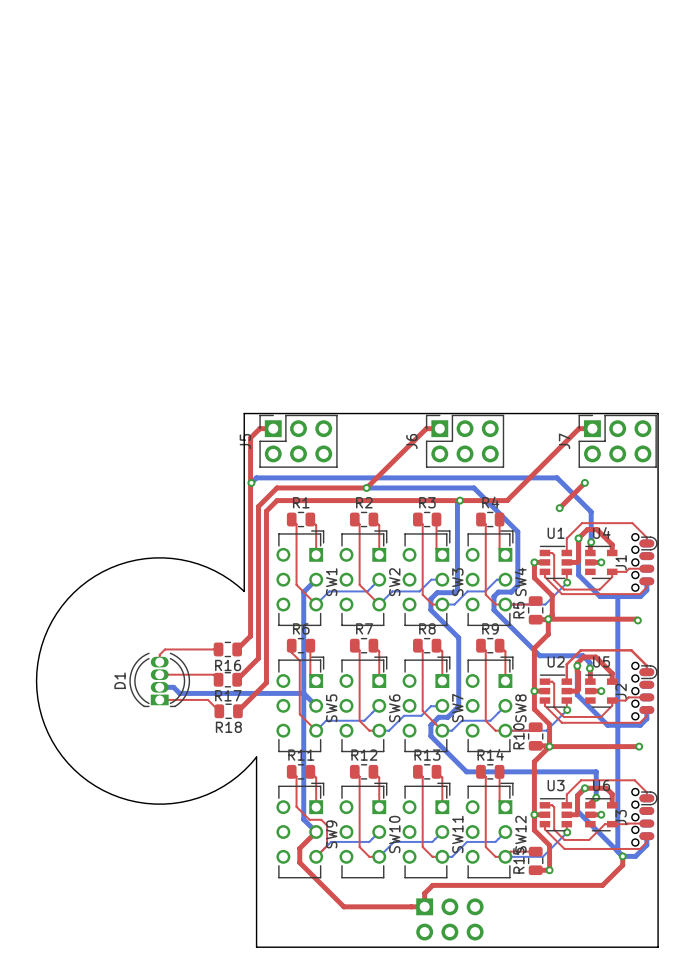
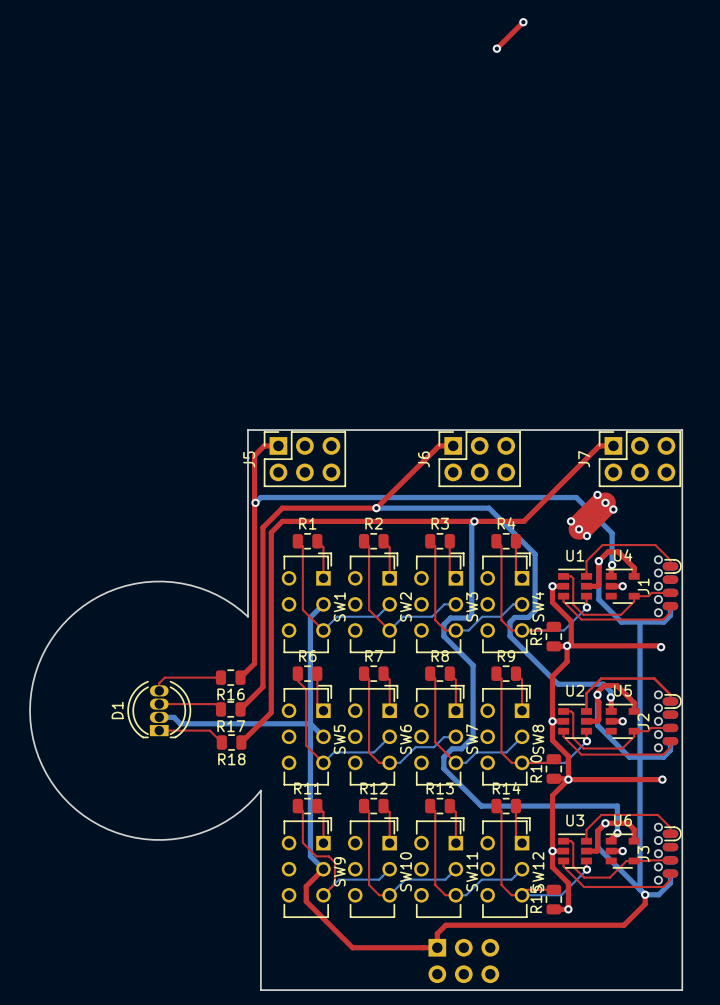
top track: none -> (523, 22) (496, 48)
via: none -> (523, 22)
via: none -> (496, 48)
top track: none -> (597, 494) (571, 521)
via: none -> (597, 494)
top track width: thin (584, 482) (559, 508) -> thick (605, 502) (579, 529)
top track: none -> (613, 509) (586, 535)
via: none -> (613, 509)
via: none -> (571, 521)
via: none -> (586, 535)

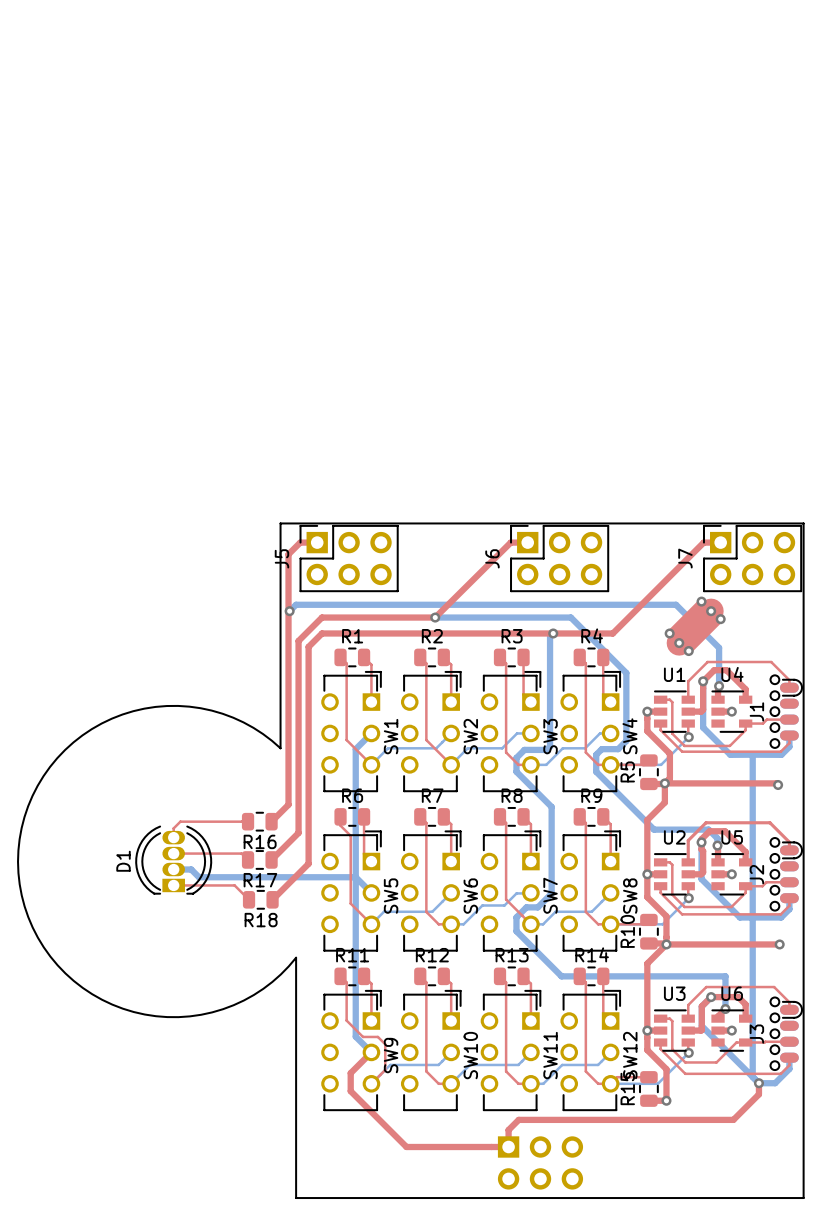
top track: (523, 22) (496, 48) -> none
via: (523, 22) -> none
via: (496, 48) -> none

